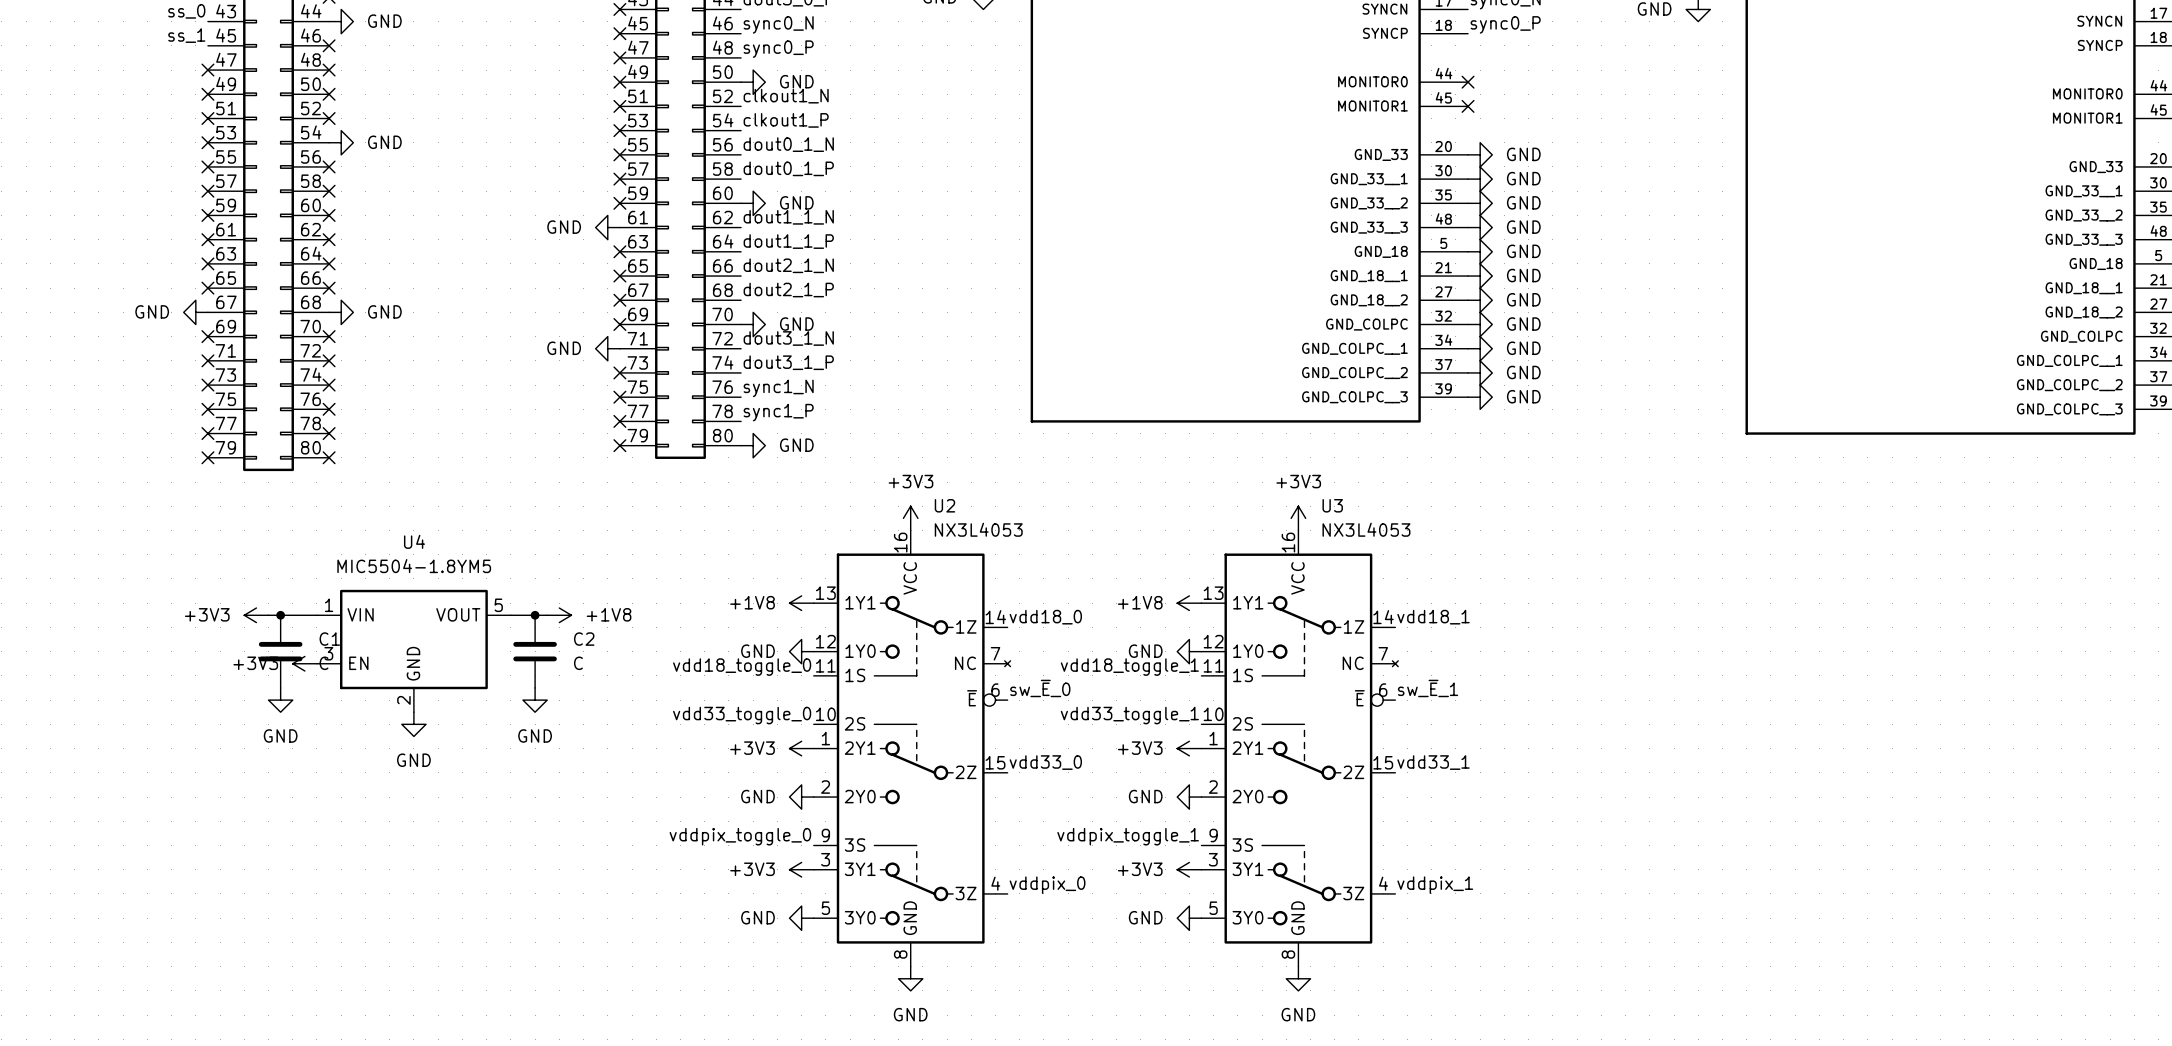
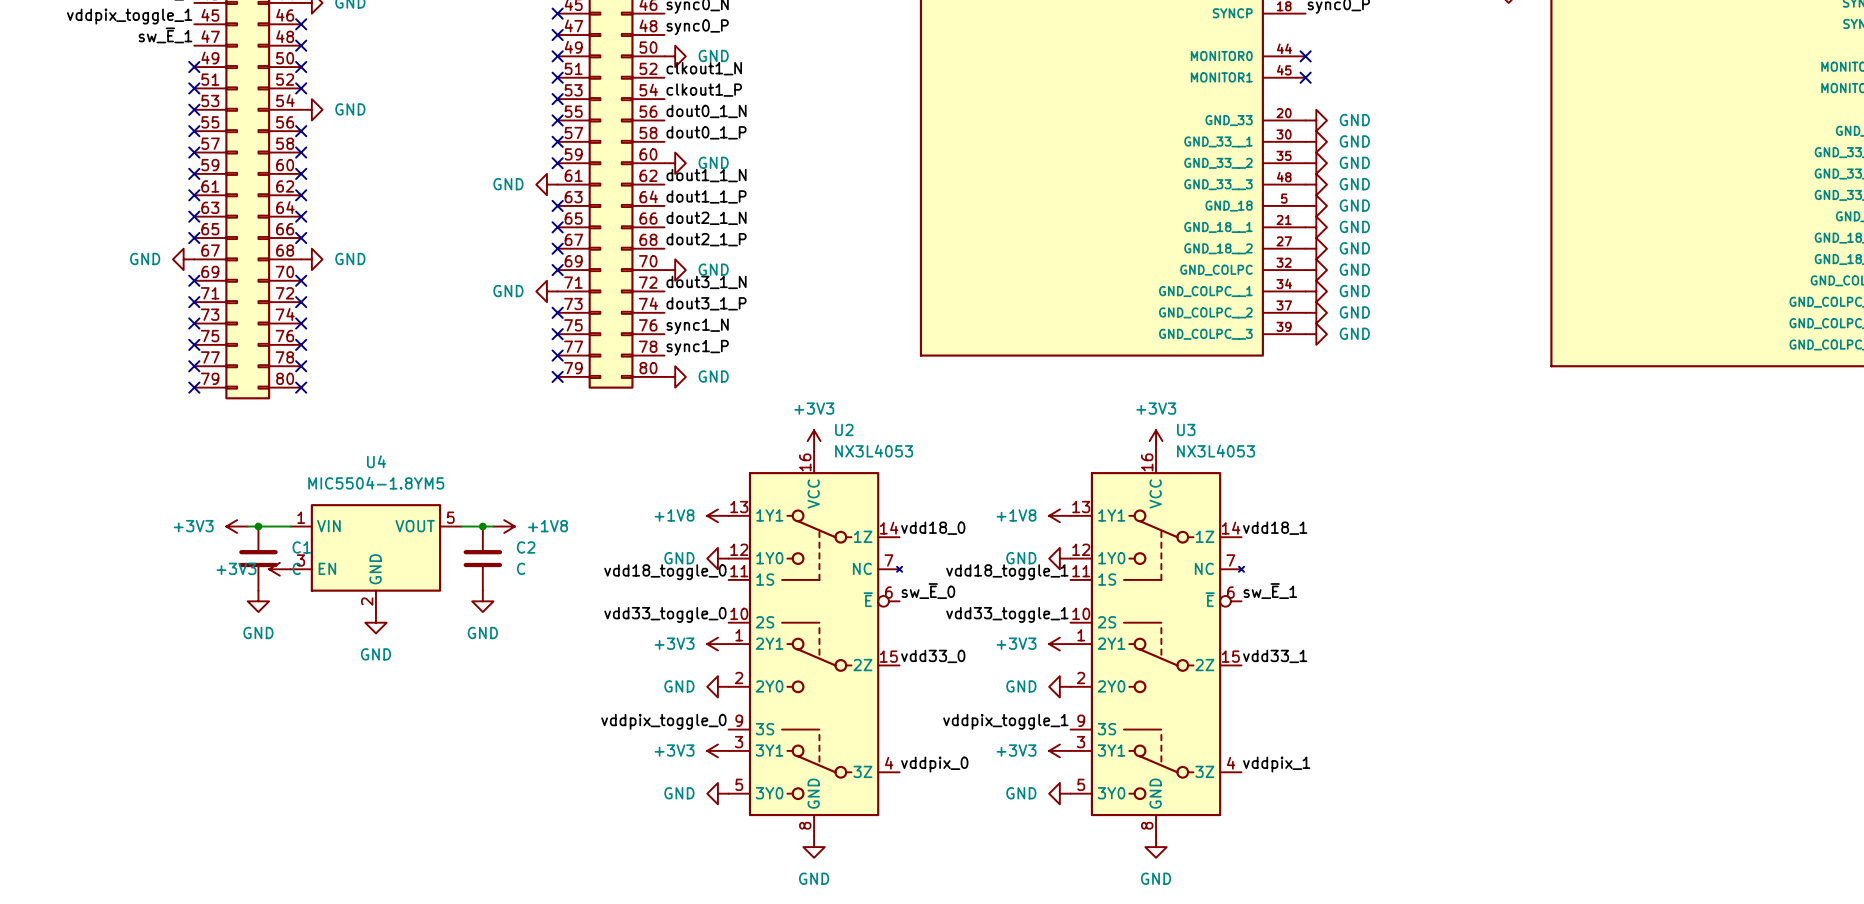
label: ss_1 (186, 35) -> vddpix_toggle_1 (129, 16)
label: none -> sw_~{E}_1 (165, 35)
no-connect mark: (207, 70) -> none

